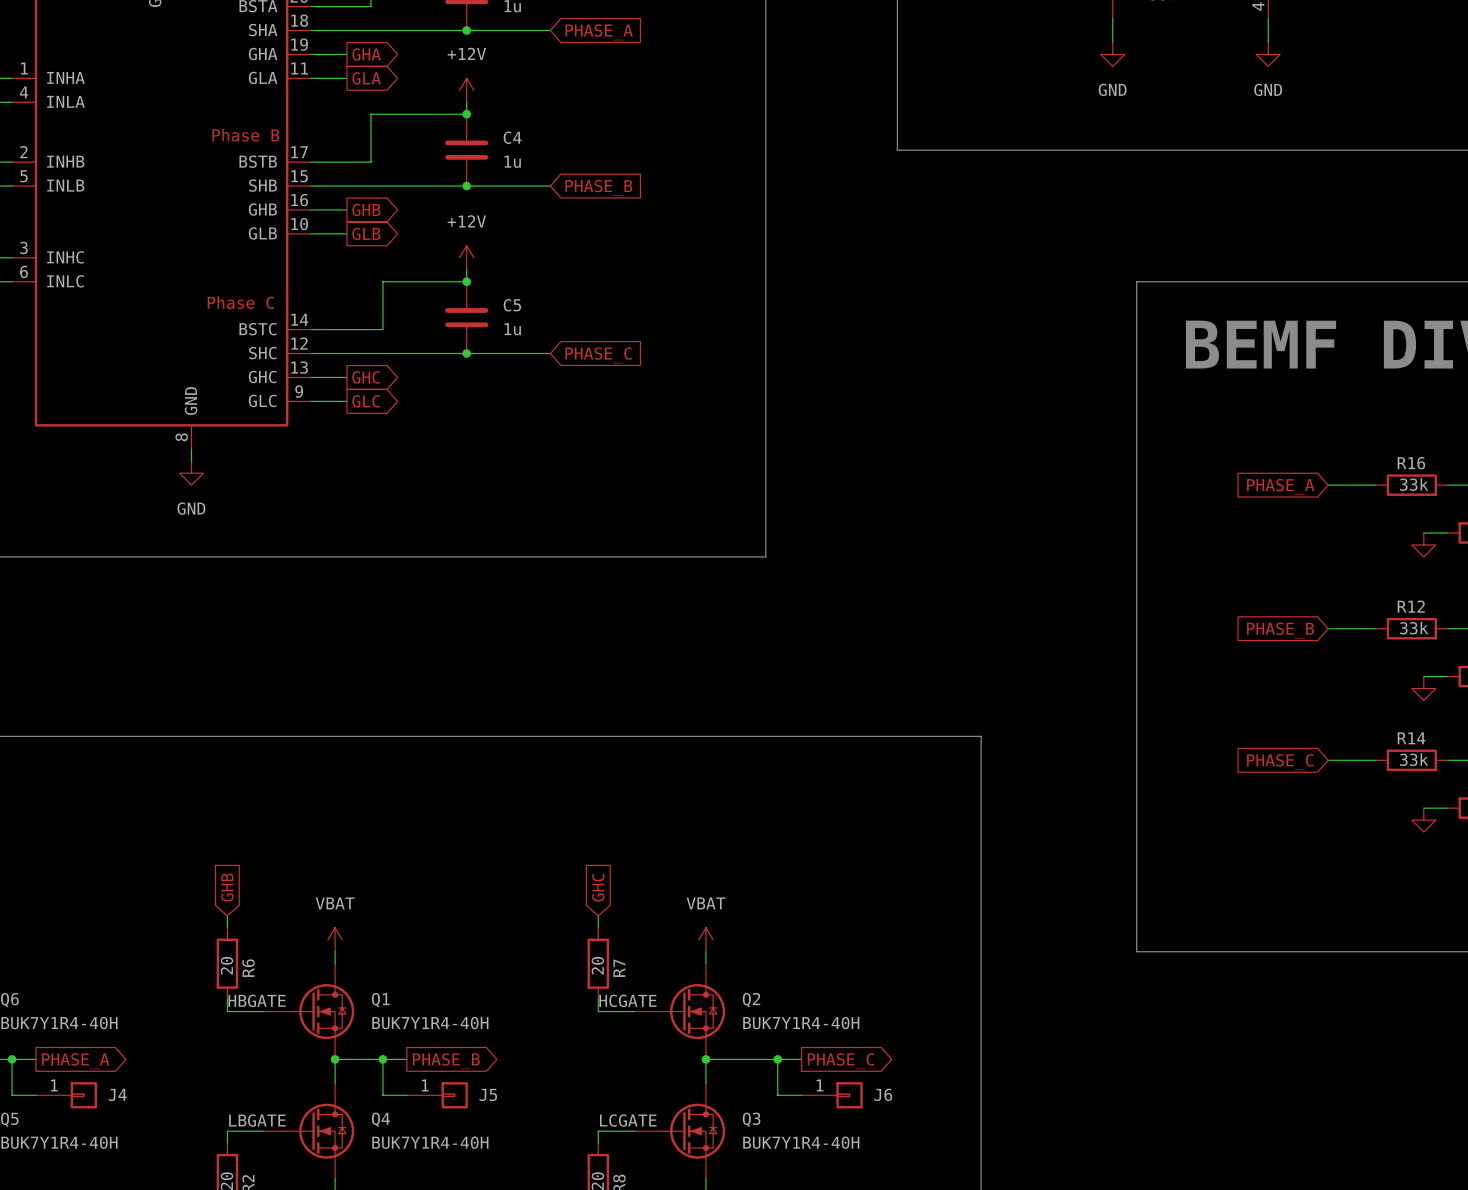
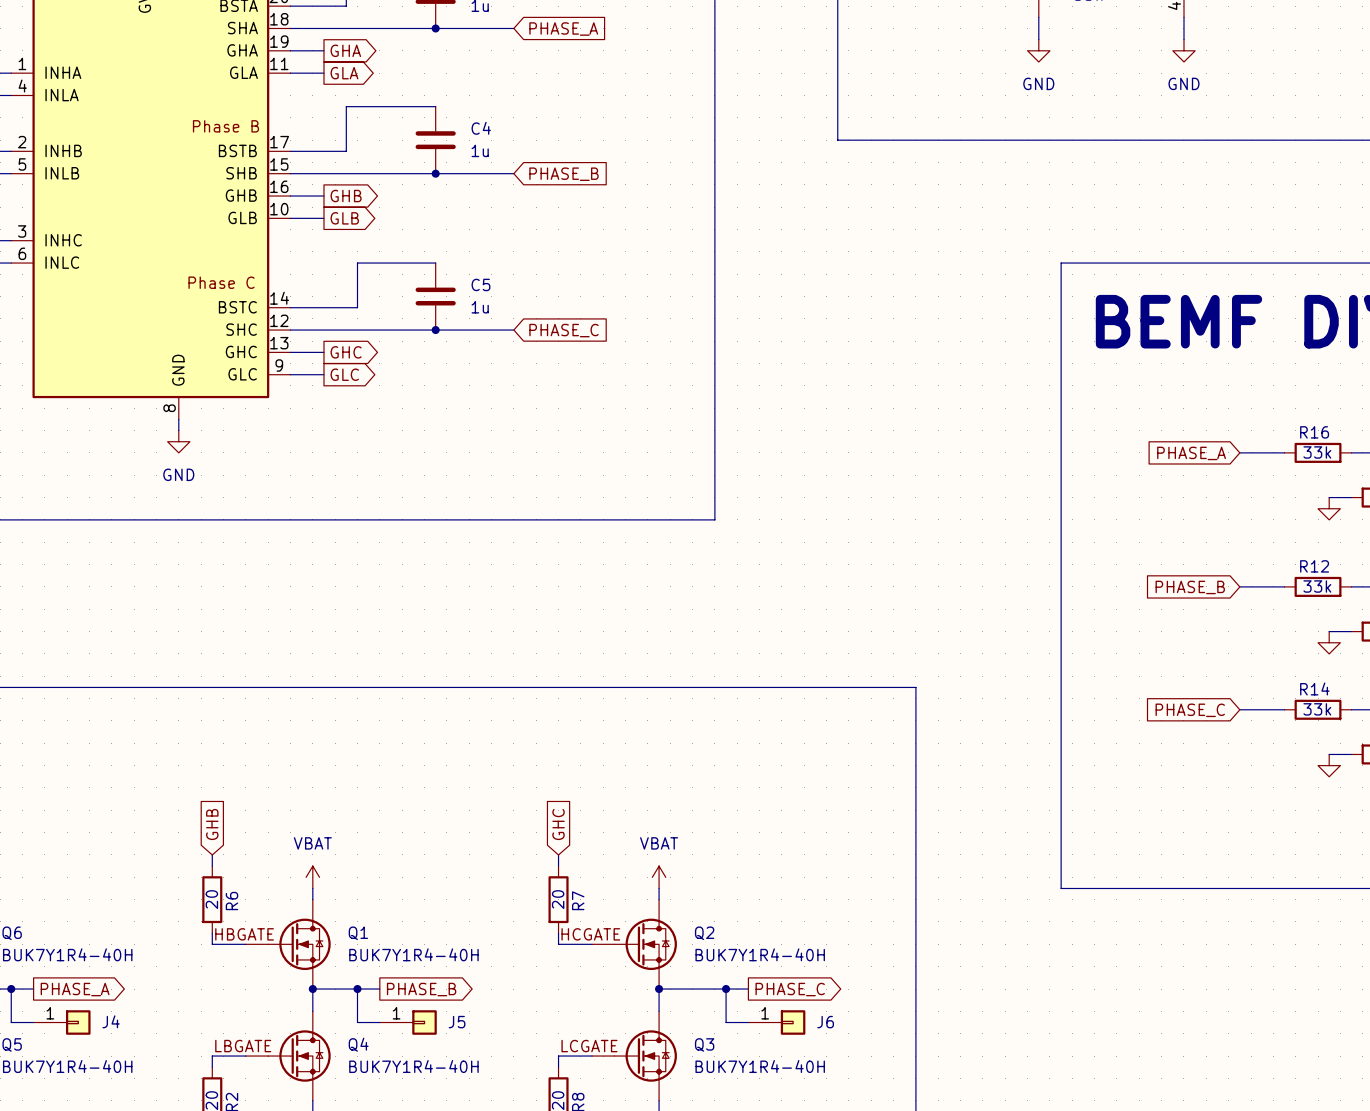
power symbol: +12V (466, 90) -> none
wire: (466, 102) (466, 114) -> none
junction: (466, 114) -> none
power symbol: +12V (466, 257) -> none
wire: (466, 269) (466, 281) -> none
junction: (466, 281) -> none

